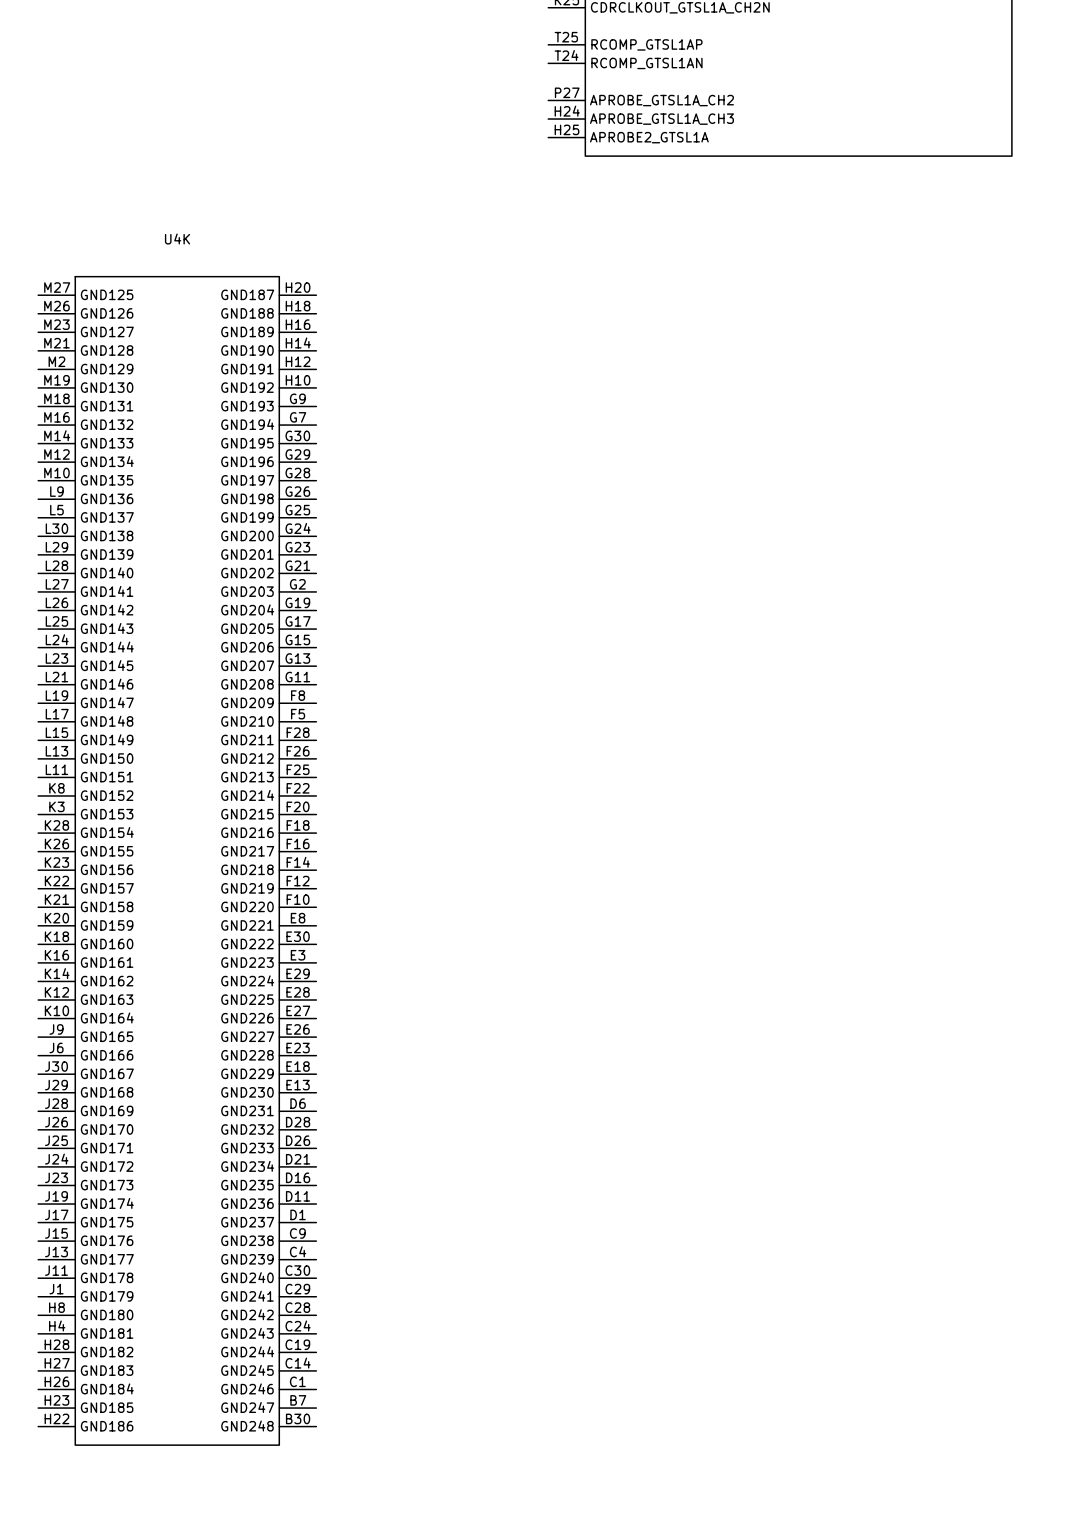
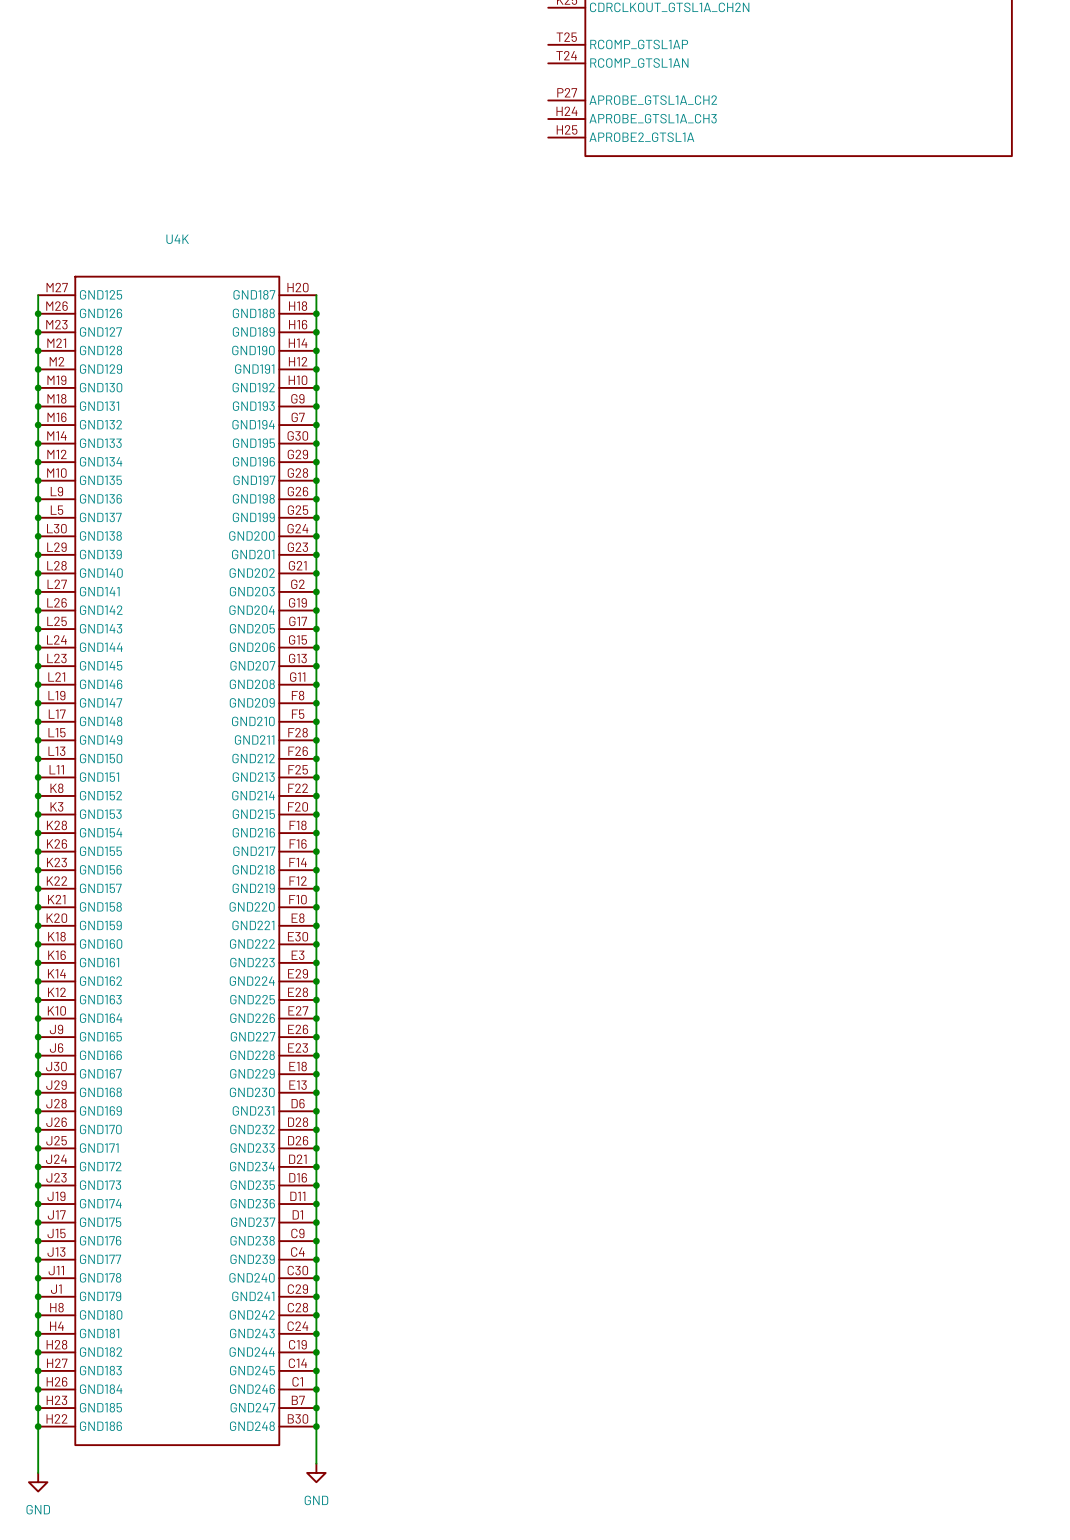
wire: none -> (38, 295) (38, 1472)
wire: none -> (316, 295) (316, 1463)
junction: none -> (38, 313)
junction: none -> (316, 313)
junction: none -> (38, 332)
junction: none -> (316, 332)
junction: none -> (38, 350)
junction: none -> (316, 350)
junction: none -> (38, 369)
junction: none -> (316, 369)
junction: none -> (38, 387)
junction: none -> (316, 387)
junction: none -> (38, 406)
junction: none -> (316, 406)
junction: none -> (38, 425)
junction: none -> (316, 425)
junction: none -> (38, 443)
junction: none -> (316, 443)
junction: none -> (38, 462)
junction: none -> (316, 462)
junction: none -> (38, 480)
junction: none -> (316, 480)
junction: none -> (38, 499)
junction: none -> (316, 499)
junction: none -> (38, 517)
junction: none -> (316, 517)
junction: none -> (38, 536)
junction: none -> (316, 536)
junction: none -> (38, 554)
junction: none -> (316, 554)
junction: none -> (38, 573)
junction: none -> (316, 573)
junction: none -> (38, 591)
junction: none -> (316, 591)
junction: none -> (38, 610)
junction: none -> (316, 610)
junction: none -> (38, 629)
junction: none -> (316, 629)
junction: none -> (38, 647)
junction: none -> (316, 647)
junction: none -> (38, 666)
junction: none -> (316, 666)
junction: none -> (38, 684)
junction: none -> (316, 684)
junction: none -> (38, 703)
junction: none -> (316, 703)
junction: none -> (38, 721)
junction: none -> (316, 721)
junction: none -> (38, 740)
junction: none -> (316, 740)
junction: none -> (38, 758)
junction: none -> (316, 758)
junction: none -> (38, 777)
junction: none -> (316, 777)
junction: none -> (38, 795)
junction: none -> (316, 795)
junction: none -> (38, 814)
junction: none -> (316, 814)
junction: none -> (38, 833)
junction: none -> (316, 833)
junction: none -> (38, 851)
junction: none -> (316, 851)
junction: none -> (38, 870)
junction: none -> (316, 870)
junction: none -> (38, 888)
junction: none -> (316, 888)
junction: none -> (38, 907)
junction: none -> (316, 907)
junction: none -> (38, 925)
junction: none -> (316, 925)
junction: none -> (38, 944)
junction: none -> (316, 944)
junction: none -> (38, 962)
junction: none -> (316, 962)
junction: none -> (38, 981)
junction: none -> (316, 981)
junction: none -> (38, 1000)
junction: none -> (316, 1000)
junction: none -> (38, 1018)
junction: none -> (316, 1018)
junction: none -> (38, 1037)
junction: none -> (316, 1037)
junction: none -> (38, 1055)
junction: none -> (316, 1055)
junction: none -> (38, 1074)
junction: none -> (316, 1074)
junction: none -> (38, 1092)
junction: none -> (316, 1092)
junction: none -> (38, 1111)
junction: none -> (316, 1111)
junction: none -> (38, 1129)
junction: none -> (316, 1129)
junction: none -> (38, 1148)
junction: none -> (316, 1148)
junction: none -> (38, 1166)
junction: none -> (316, 1166)
junction: none -> (38, 1185)
junction: none -> (316, 1185)
junction: none -> (38, 1204)
junction: none -> (316, 1204)
junction: none -> (38, 1222)
junction: none -> (316, 1222)
junction: none -> (38, 1241)
junction: none -> (316, 1241)
junction: none -> (38, 1259)
junction: none -> (316, 1259)
junction: none -> (38, 1278)
junction: none -> (316, 1278)
junction: none -> (38, 1296)
junction: none -> (316, 1296)
junction: none -> (38, 1315)
junction: none -> (316, 1315)
junction: none -> (38, 1333)
junction: none -> (316, 1333)
junction: none -> (38, 1352)
junction: none -> (316, 1352)
junction: none -> (38, 1370)
junction: none -> (316, 1370)
junction: none -> (38, 1389)
junction: none -> (316, 1389)
junction: none -> (38, 1408)
junction: none -> (316, 1408)
junction: none -> (38, 1426)
junction: none -> (316, 1426)
power symbol: none -> GND (316, 1472)
power symbol: none -> GND (38, 1482)

